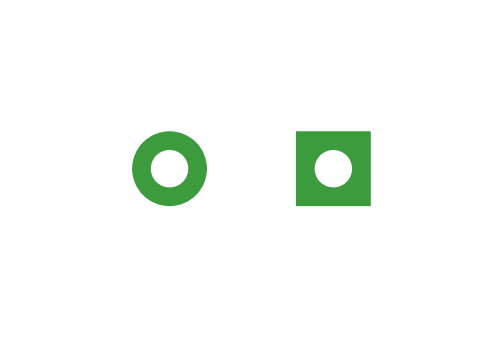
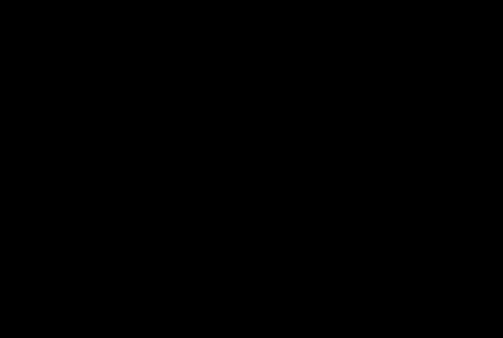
part: (251, 168) -> none

